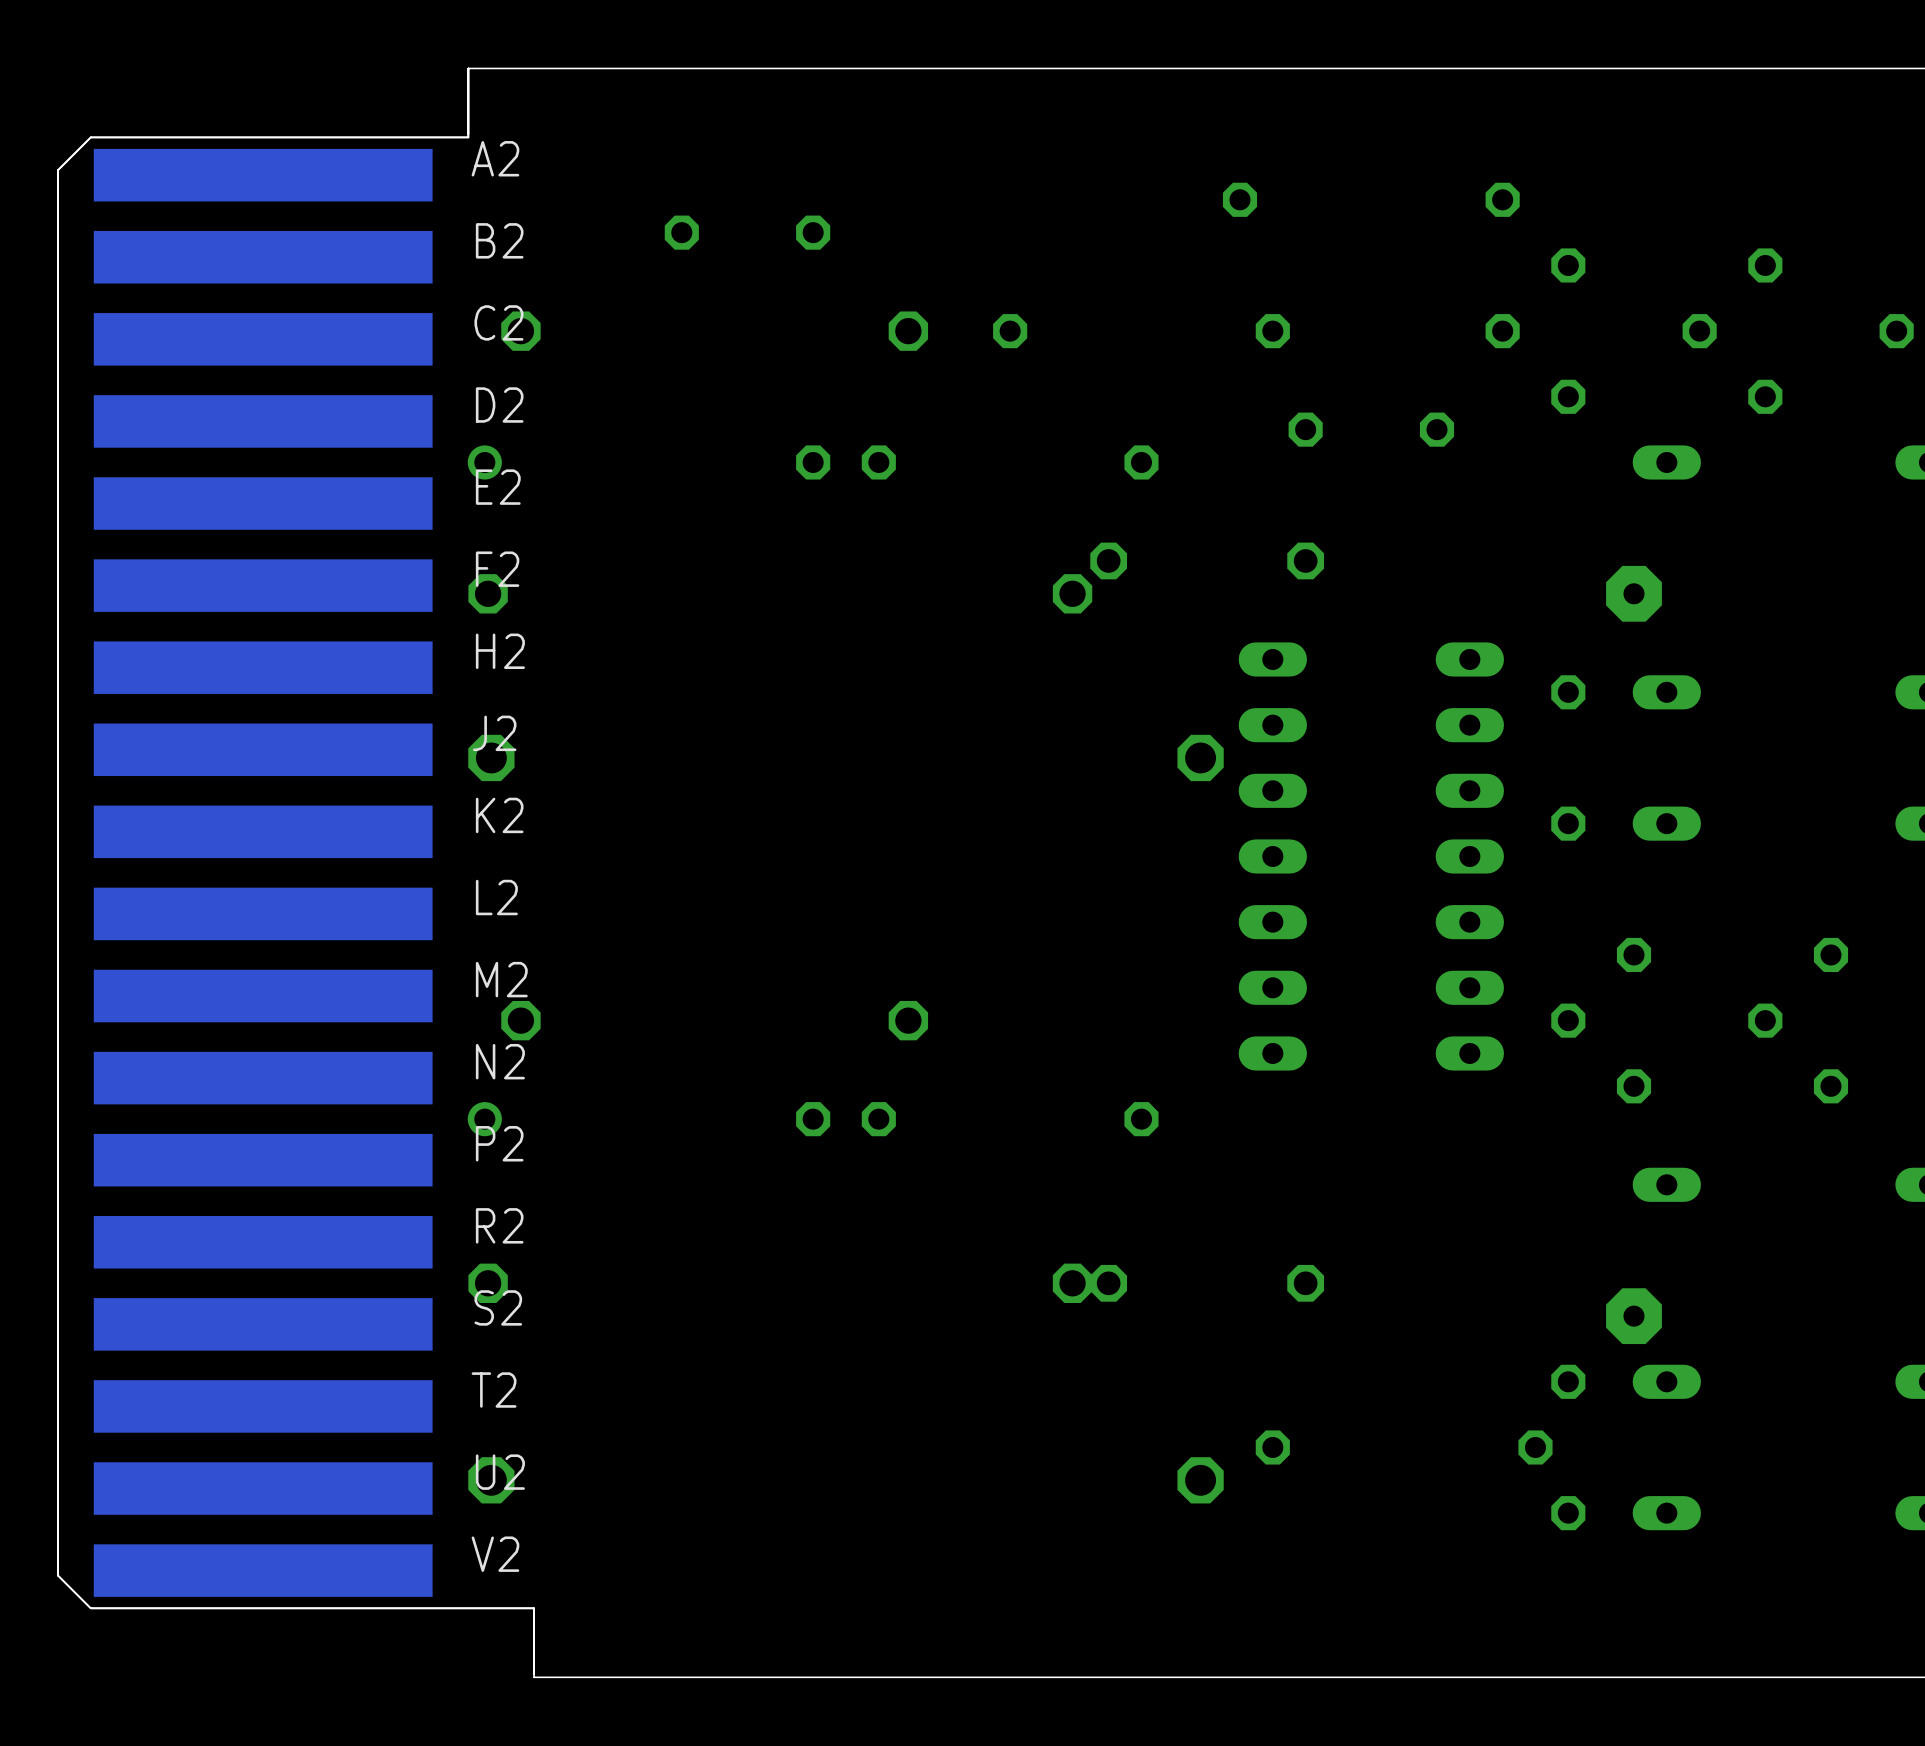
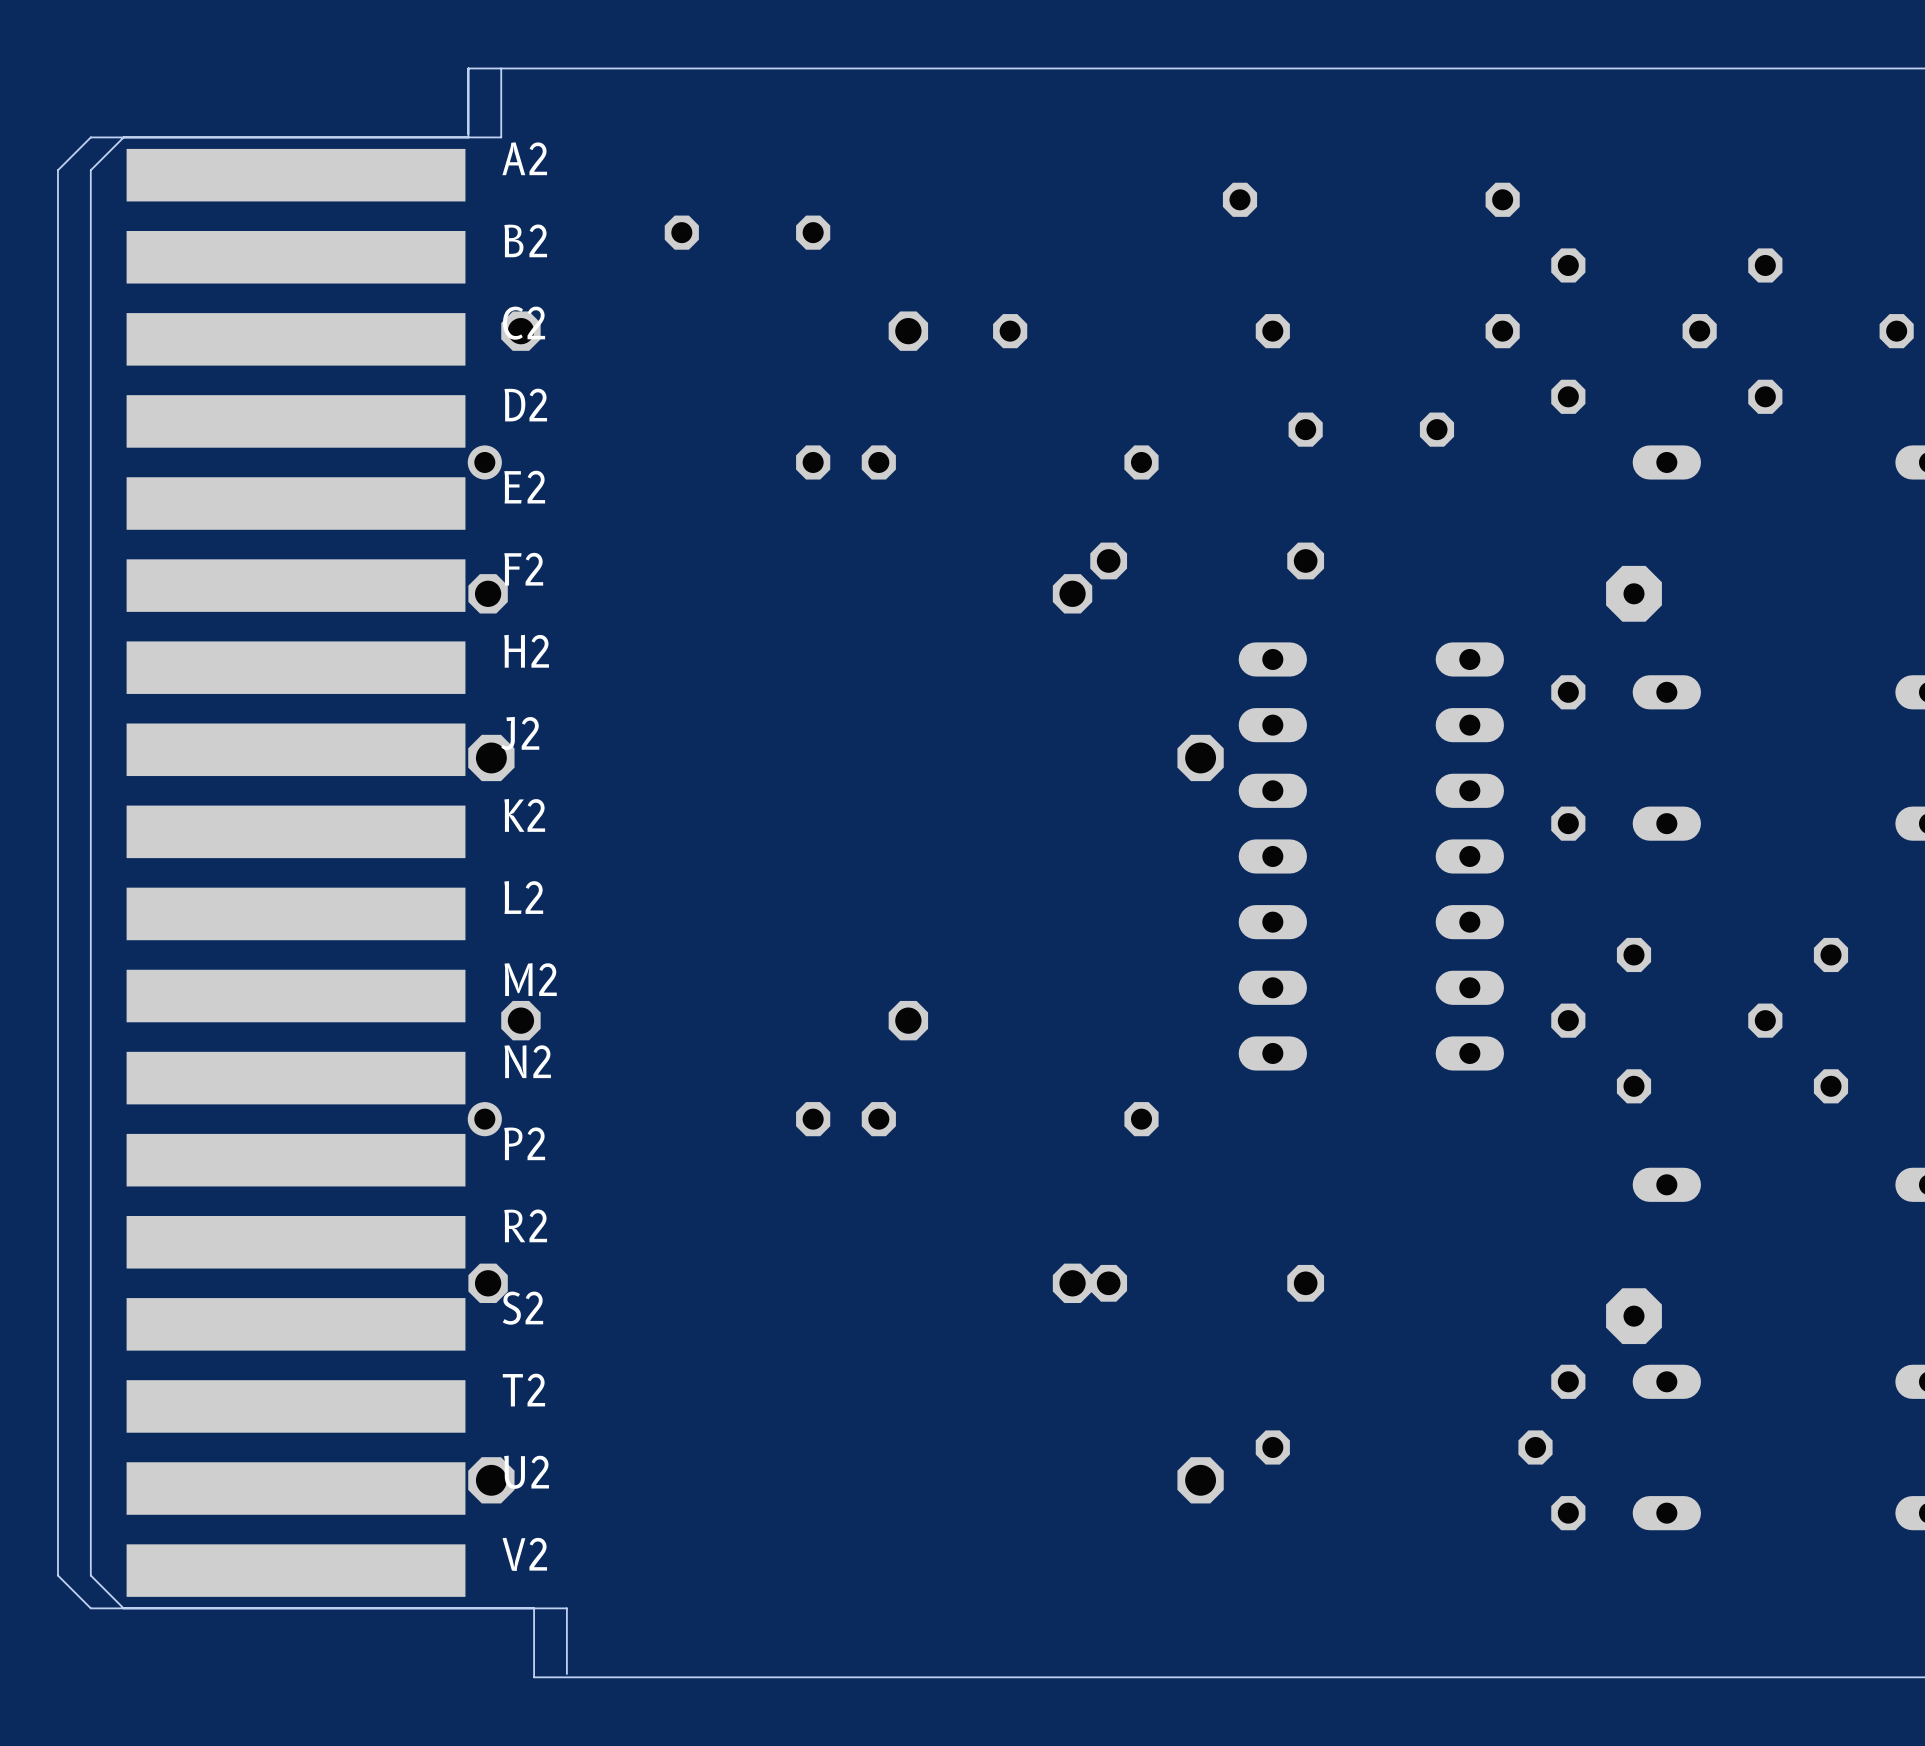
part position: (296, 871) -> (328, 871)

